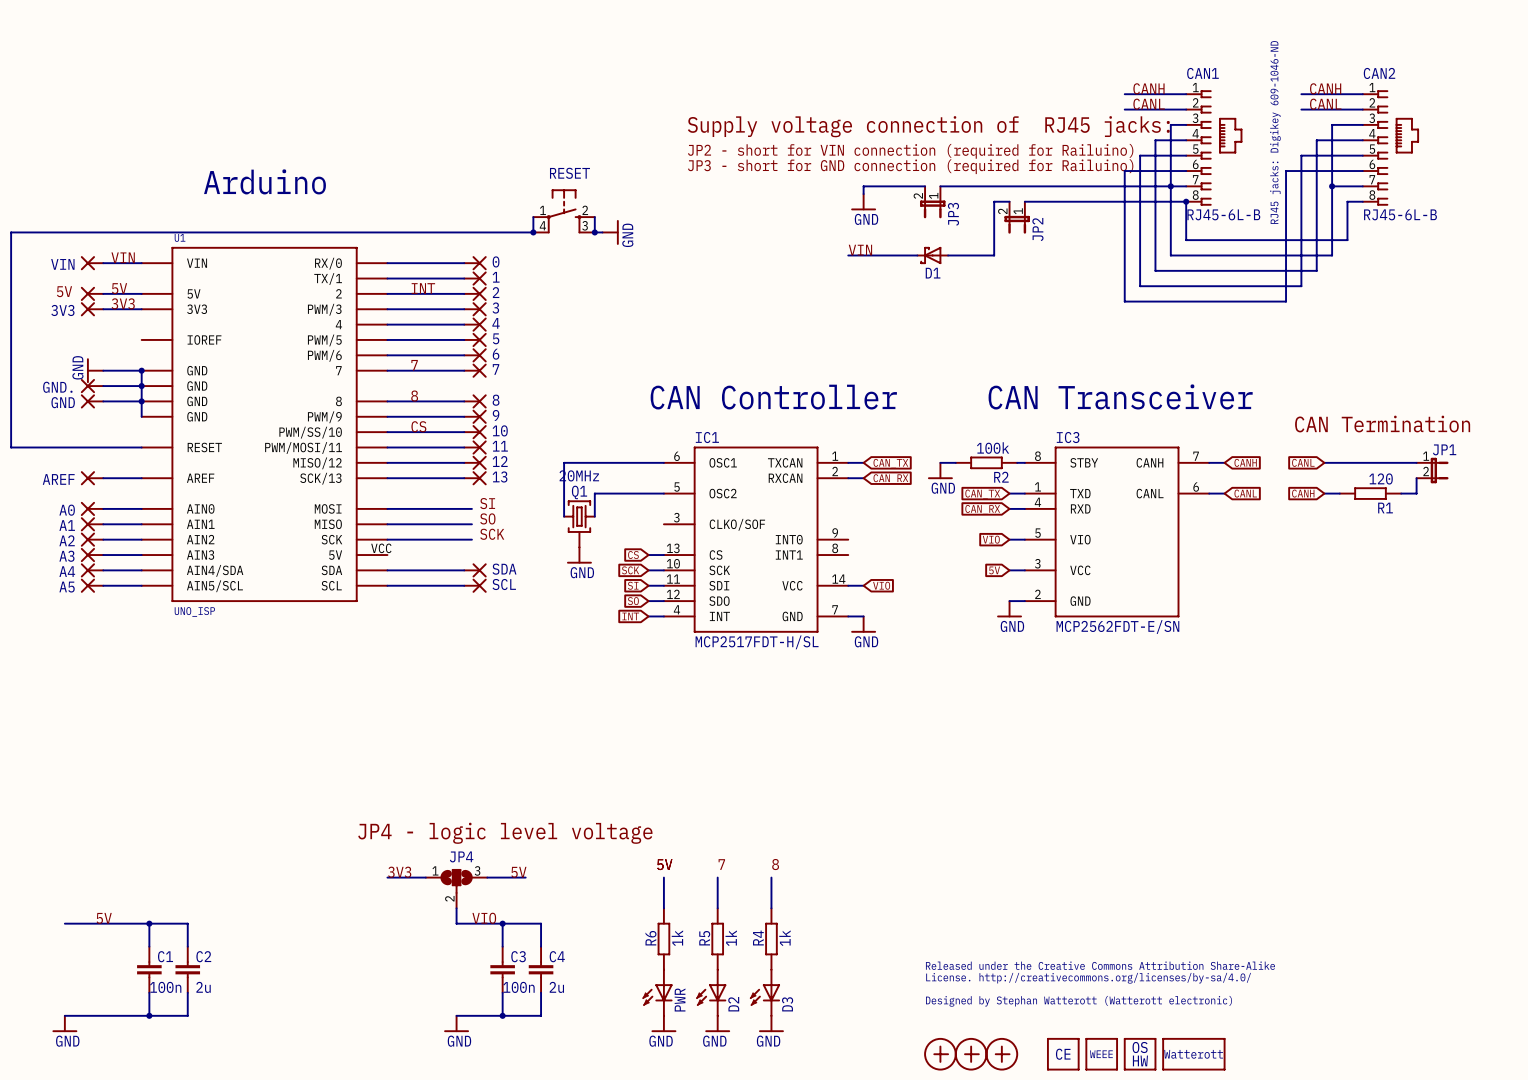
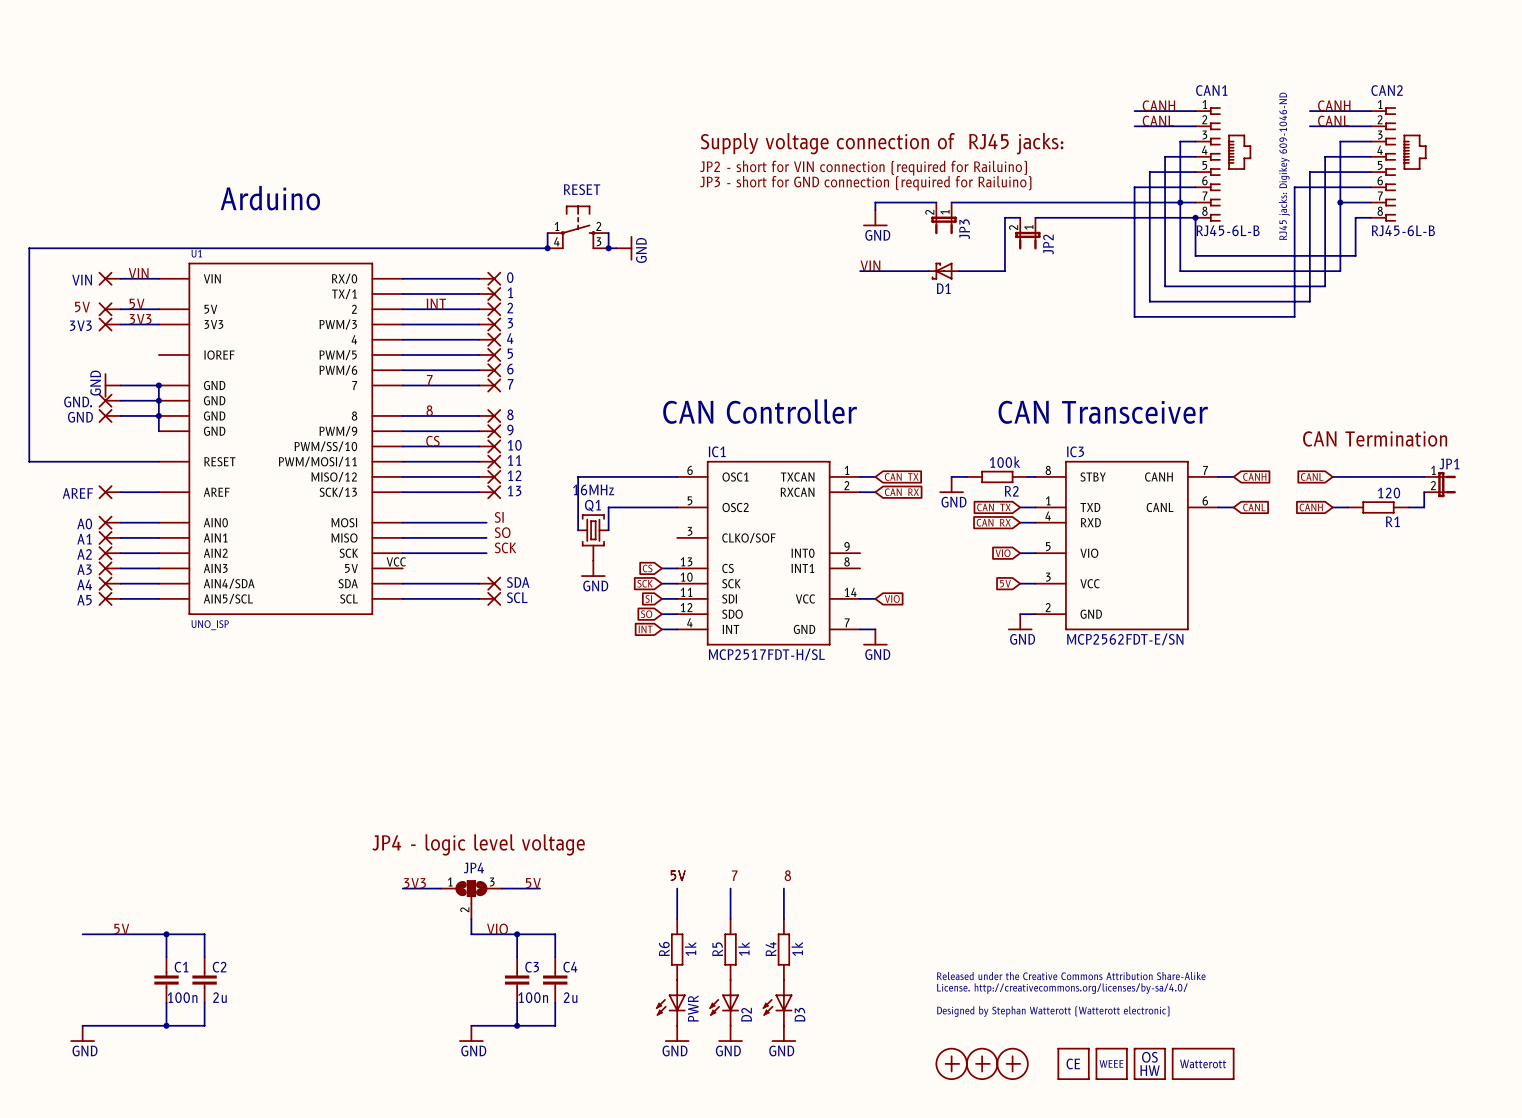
Q1 value: 20MHz (579, 475) -> 16MHz (593, 489)

